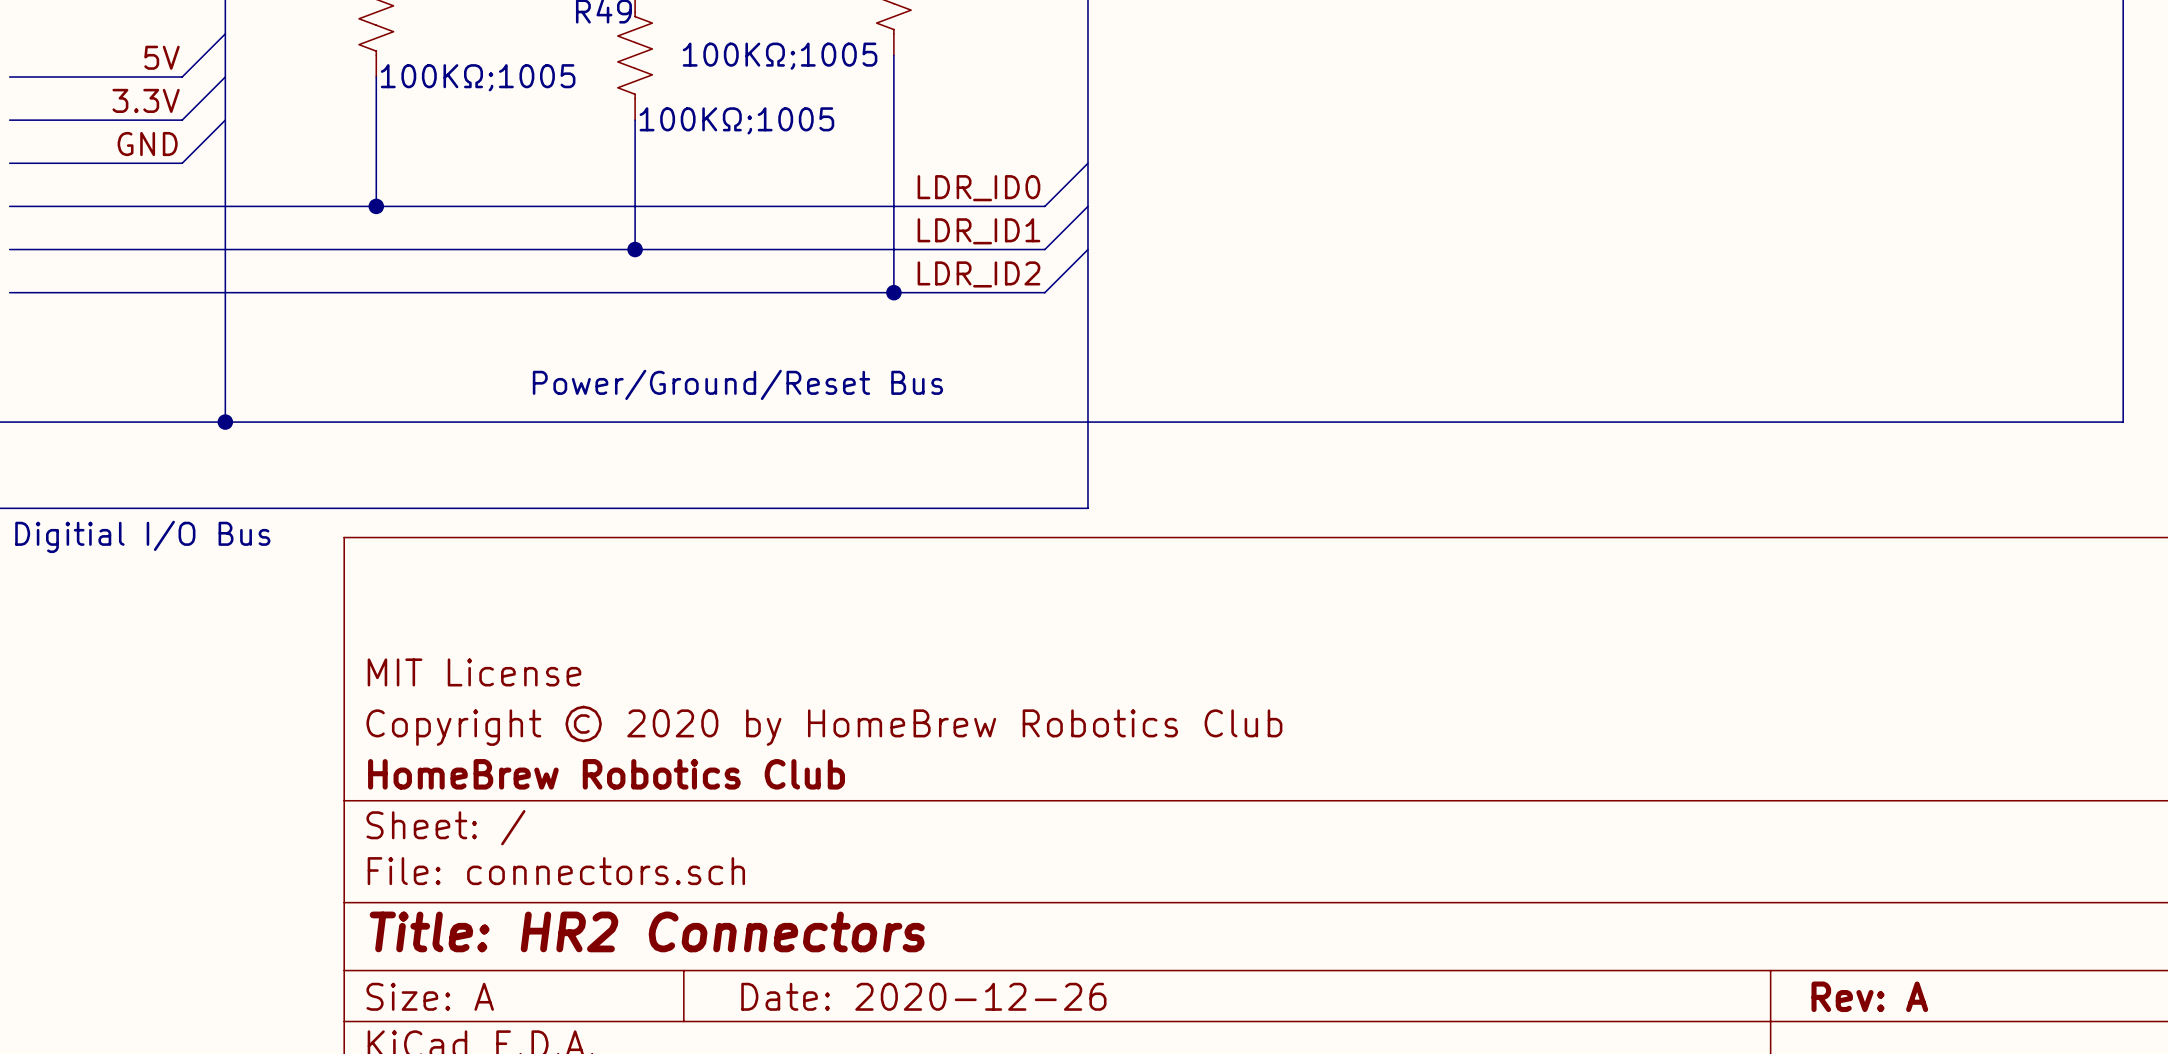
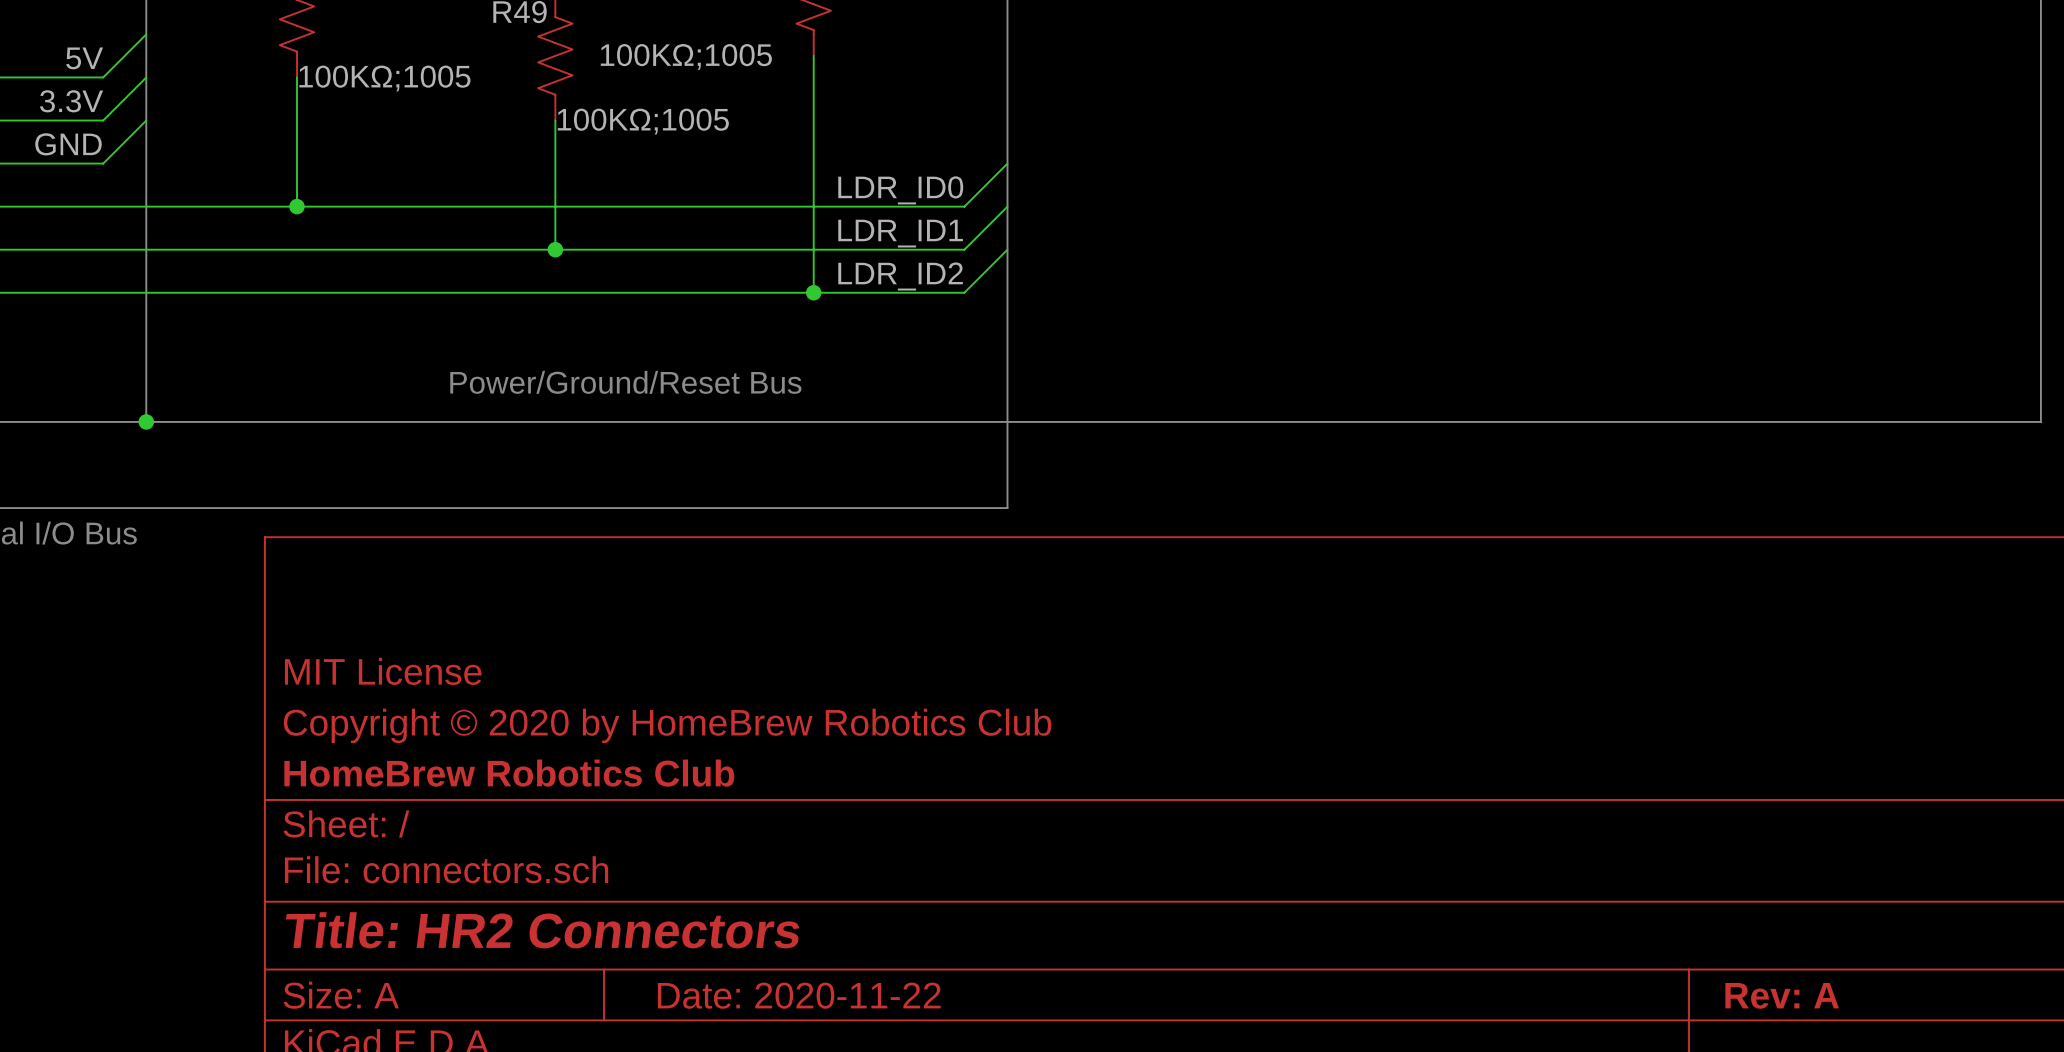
title block: Date: 2020-12-26 (923, 996) -> Date: 2020-11-22 (799, 995)

